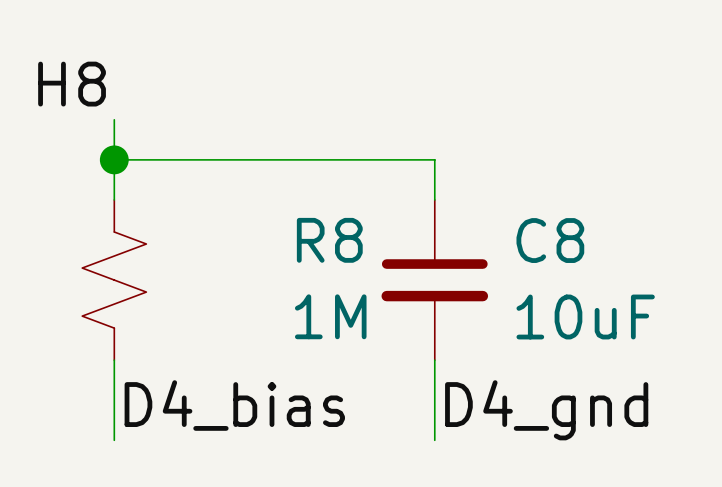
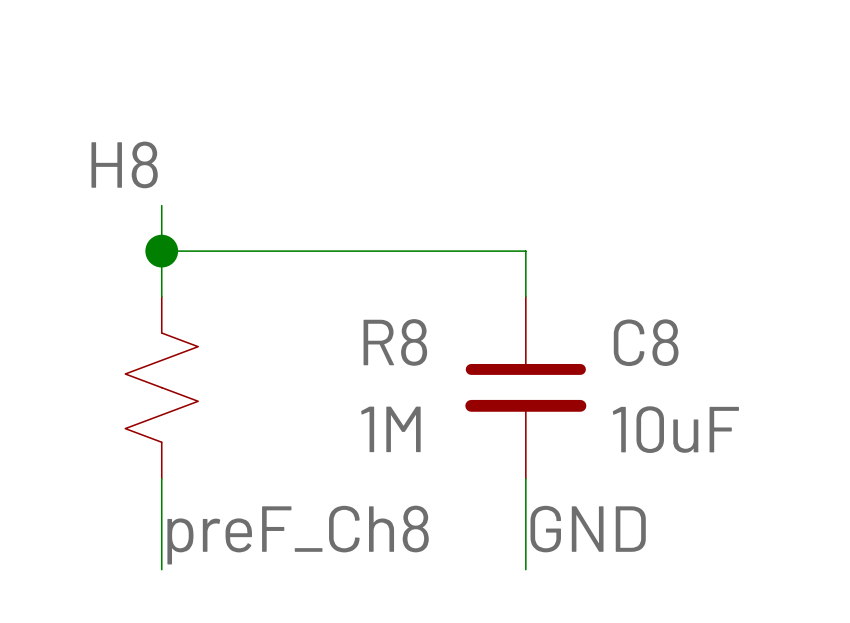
label: D4_bias (234, 405) -> preF_Ch8 (298, 535)
label: D4_gnd (546, 410) -> GND (588, 529)

